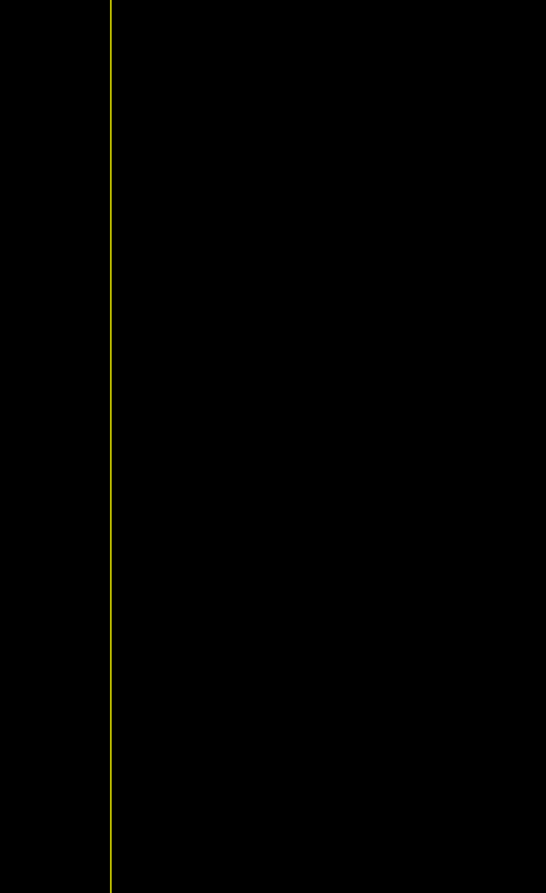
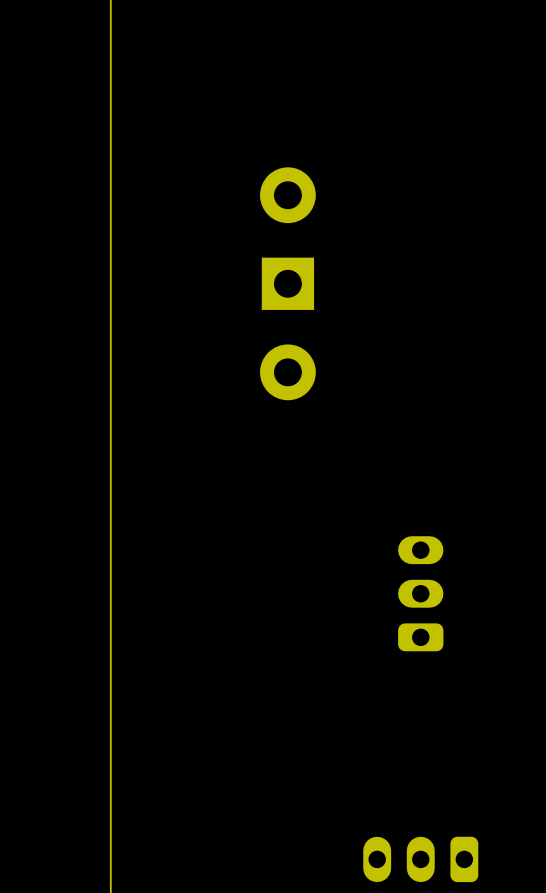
part: none -> (287, 283)
part: none -> (420, 593)
part: none -> (420, 859)

